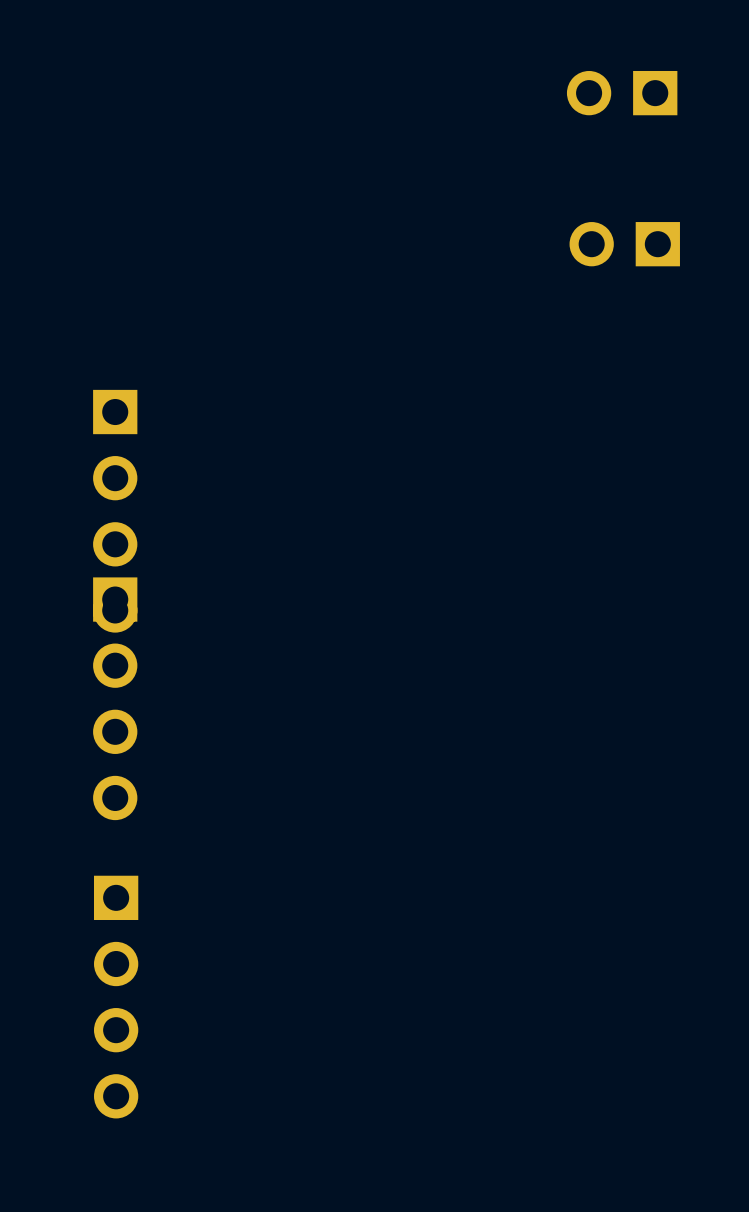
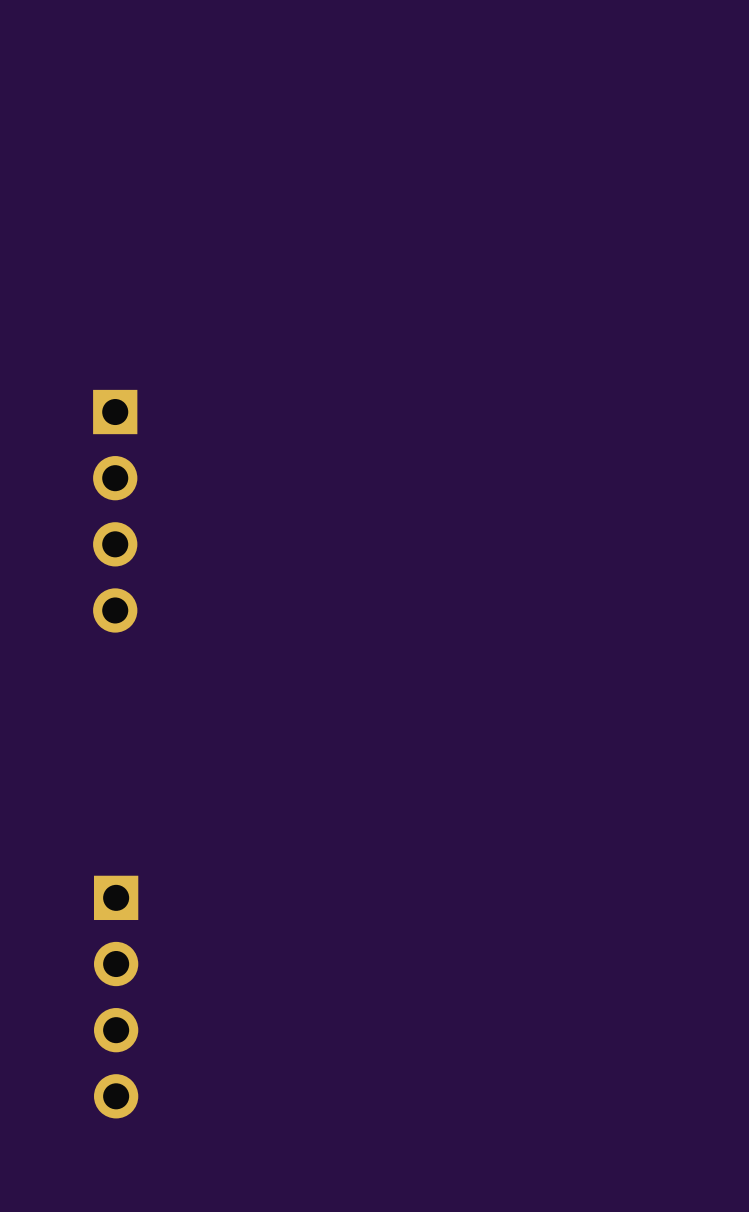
part: (622, 93) -> none
part: (624, 244) -> none
part: (115, 698) -> none

